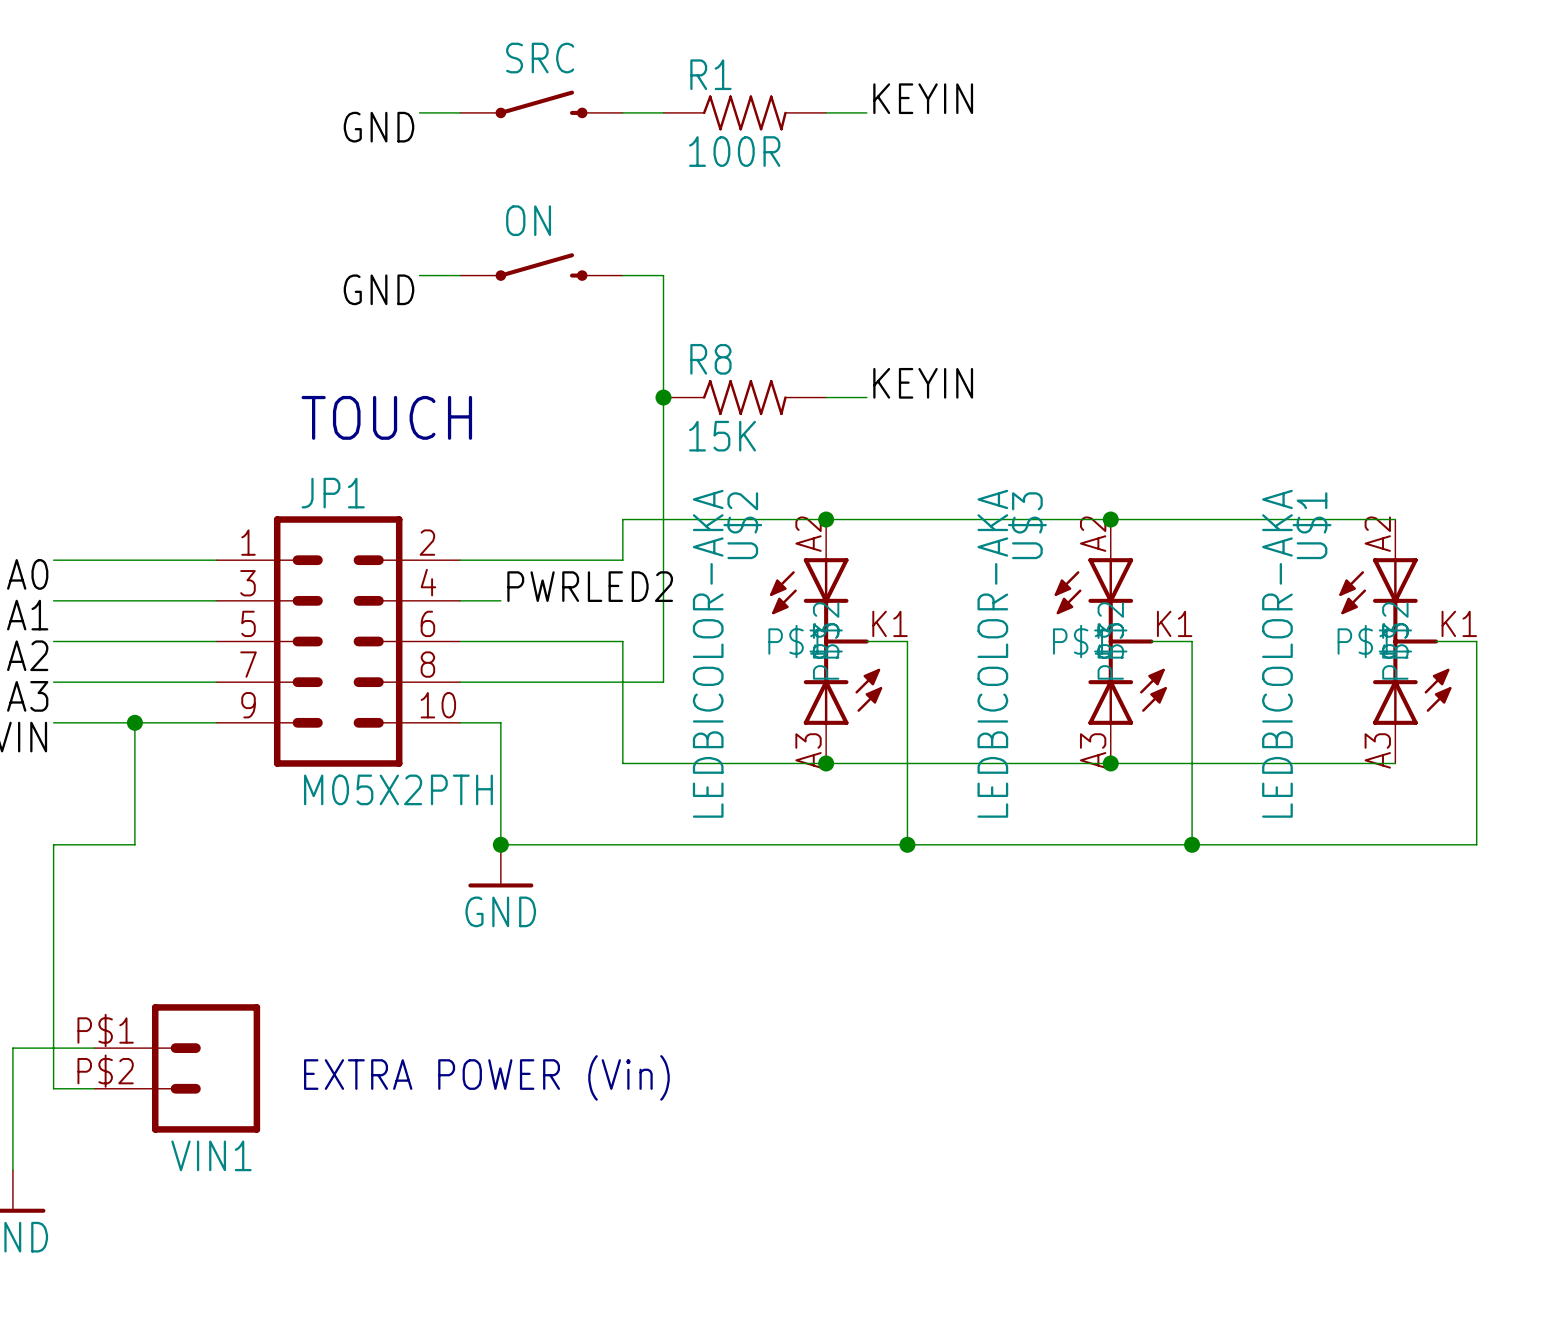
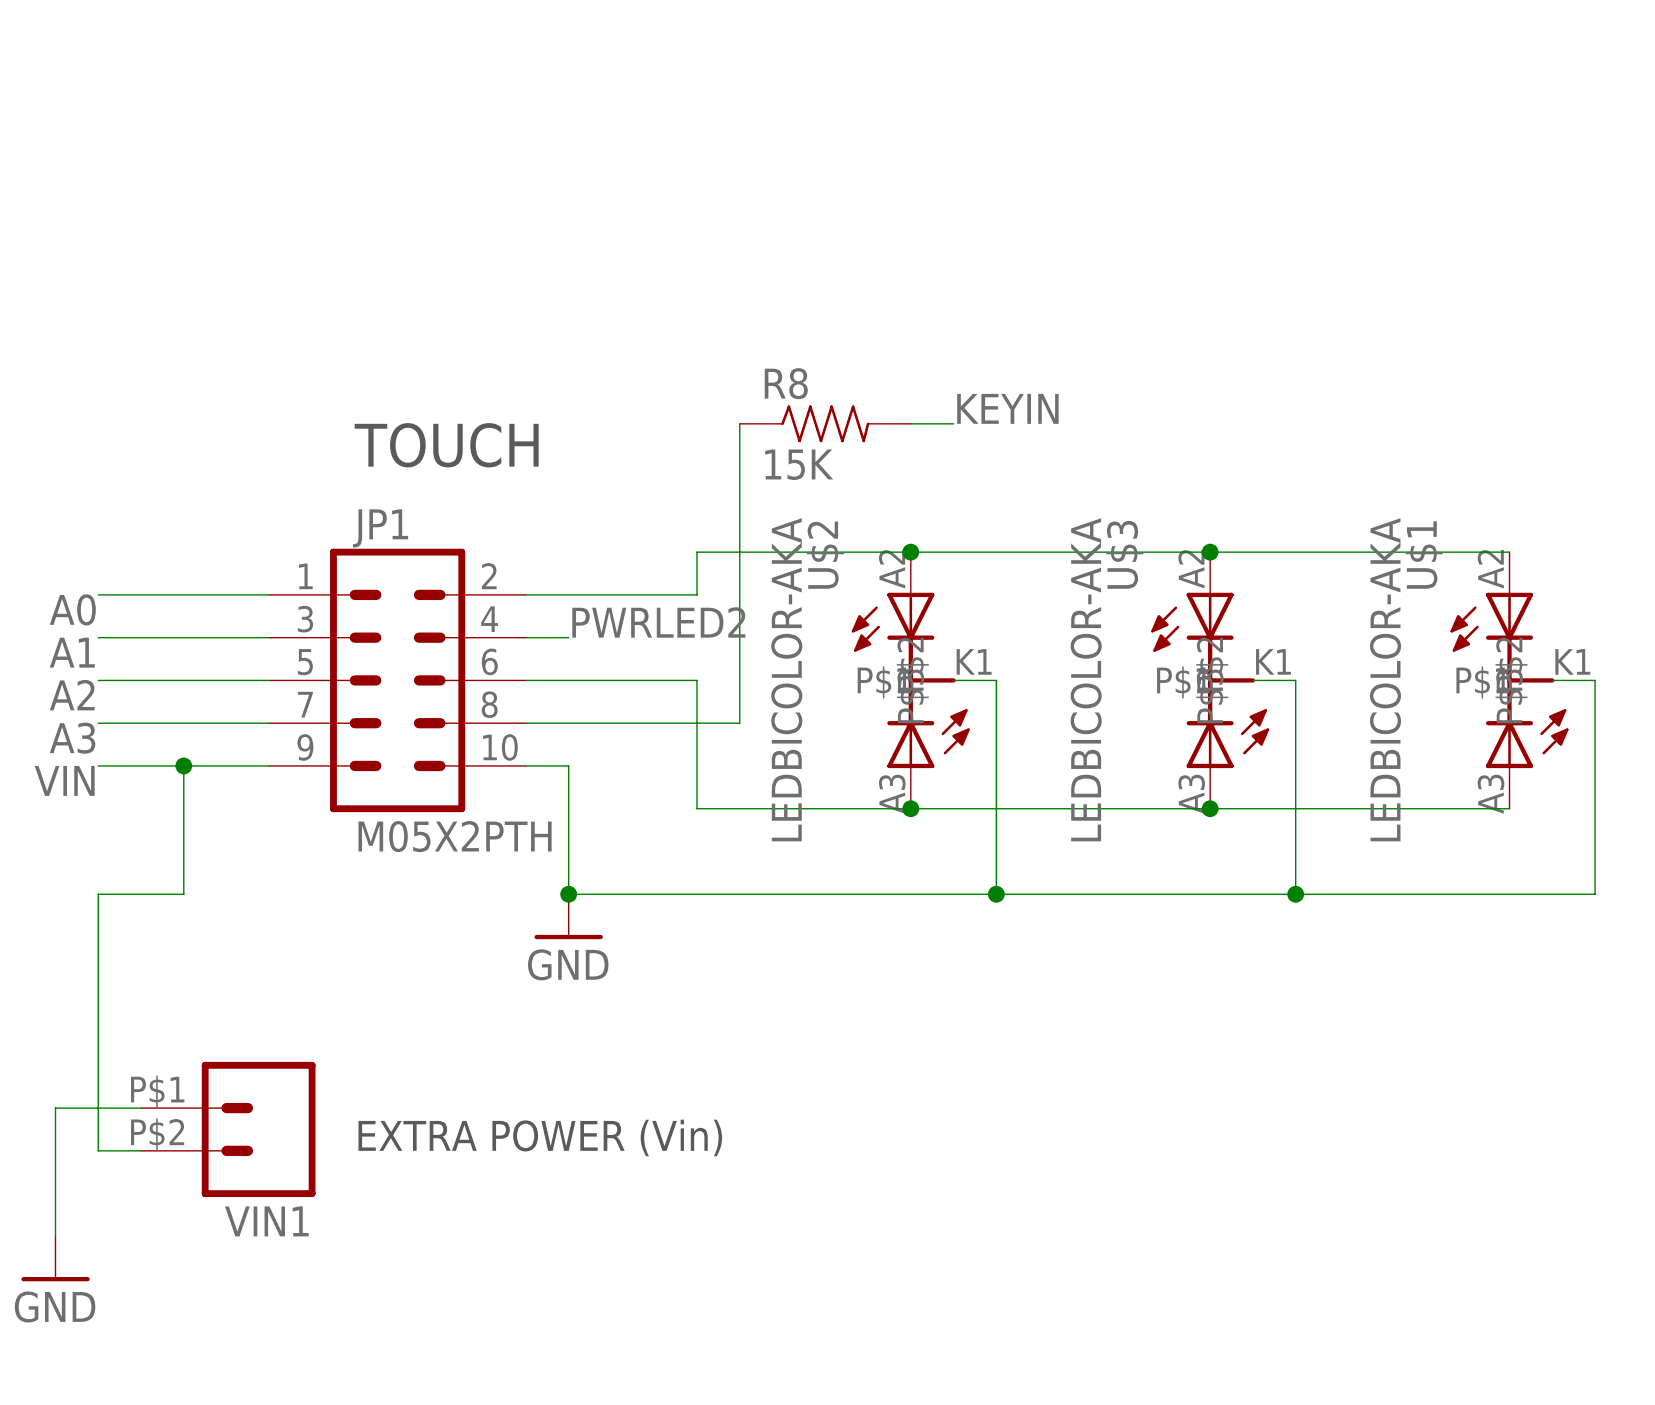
label: KEYIN (923, 98) -> none
SRC: (541, 104) -> none
wire: (419, 112) (460, 112) -> none
wire: (622, 112) (663, 112) -> none
R1: 100R (744, 112) -> none
wire: (826, 112) (866, 112) -> none
label: GND (379, 127) -> none
ON: (541, 267) -> none
wire: (419, 275) (460, 275) -> none
wire: (622, 275) (663, 275) (663, 397) -> none
label: GND (379, 289) -> none
junction: (663, 397) -> none

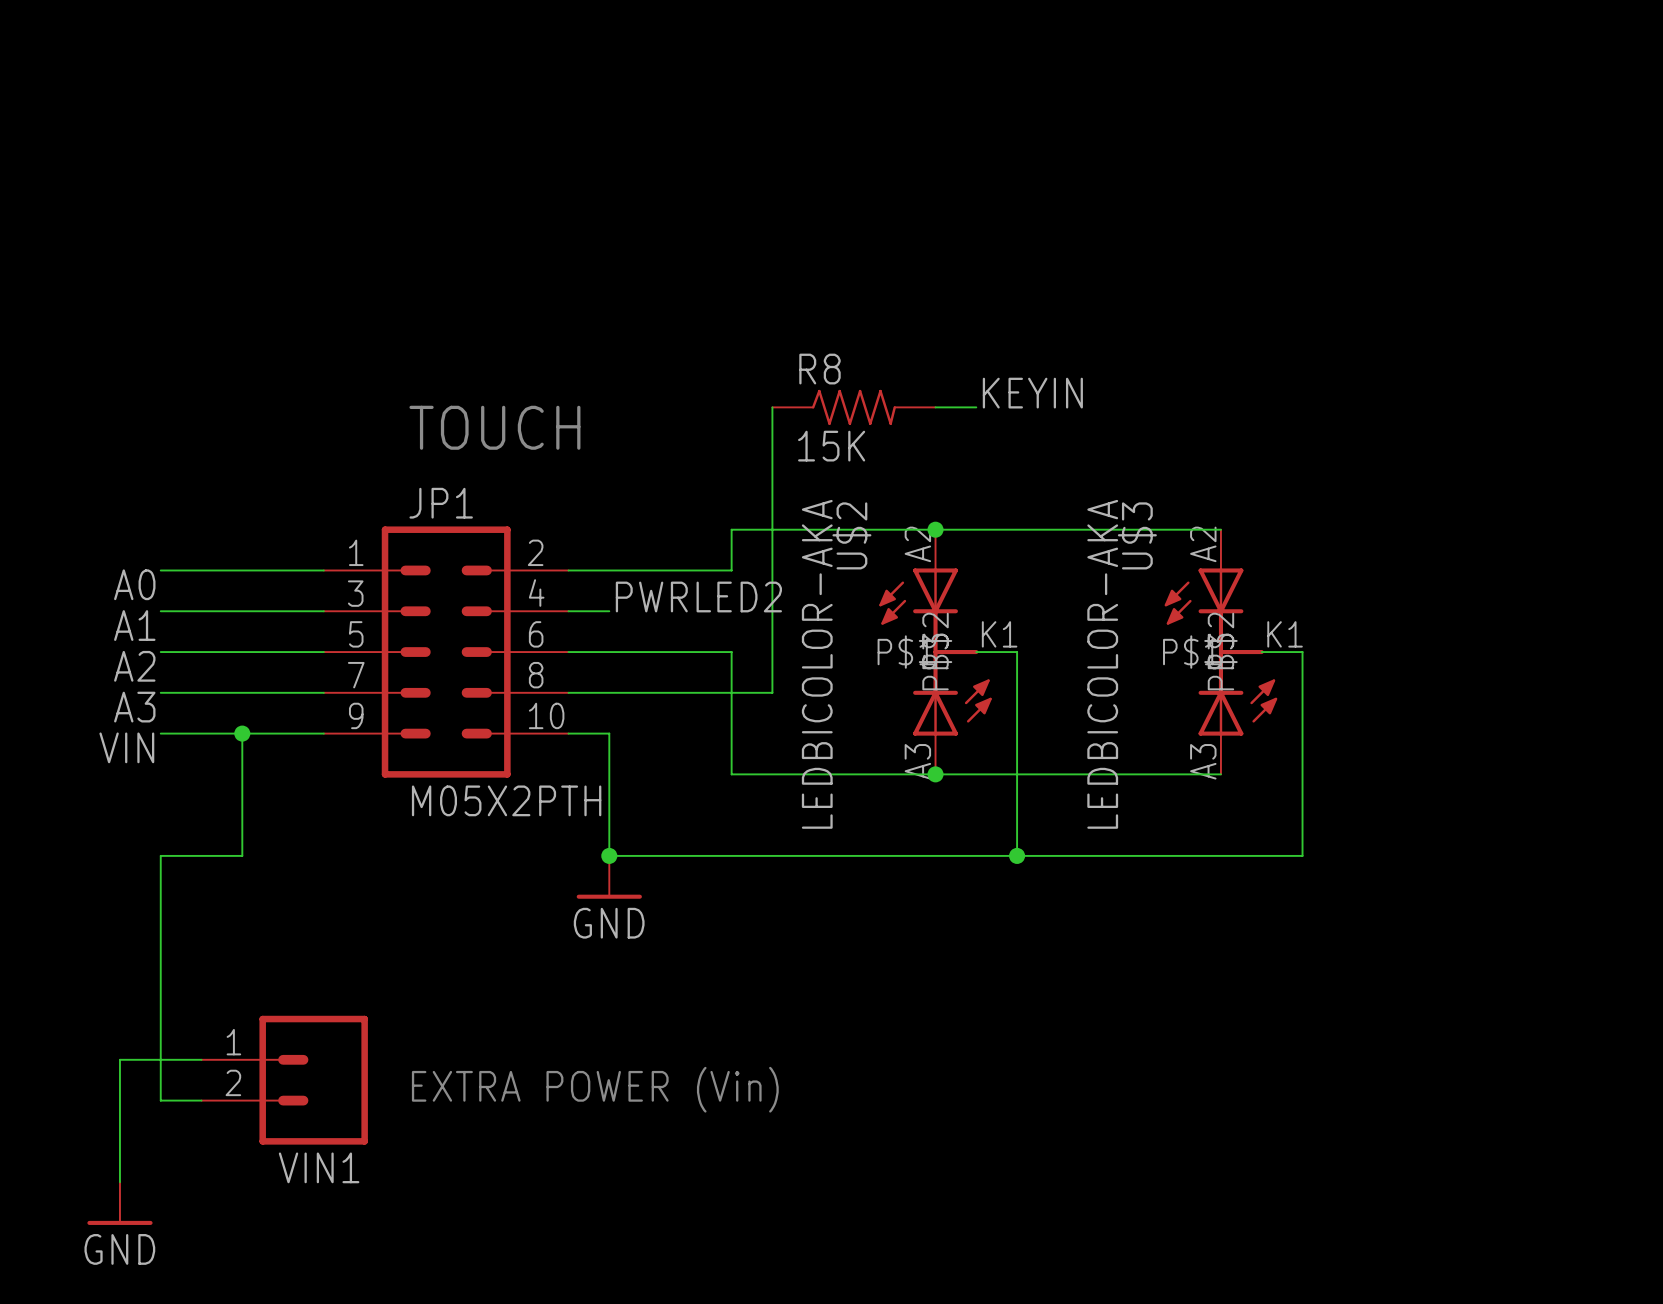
wire: (1210, 552) (1509, 552) -> none
junction: (1210, 552) -> none
U$1: LEDBICOLOR-AKA (1509, 680) -> none
wire: (1552, 680) (1595, 680) (1595, 894) (1295, 894) -> none
wire: (1210, 808) (1509, 808) -> none
junction: (1210, 808) -> none
junction: (1295, 894) -> none
VIN1 pin number: P$1 (157, 1091) -> 1 (233, 1042)
VIN1 pin number: P$2 (157, 1134) -> 2 (233, 1082)

